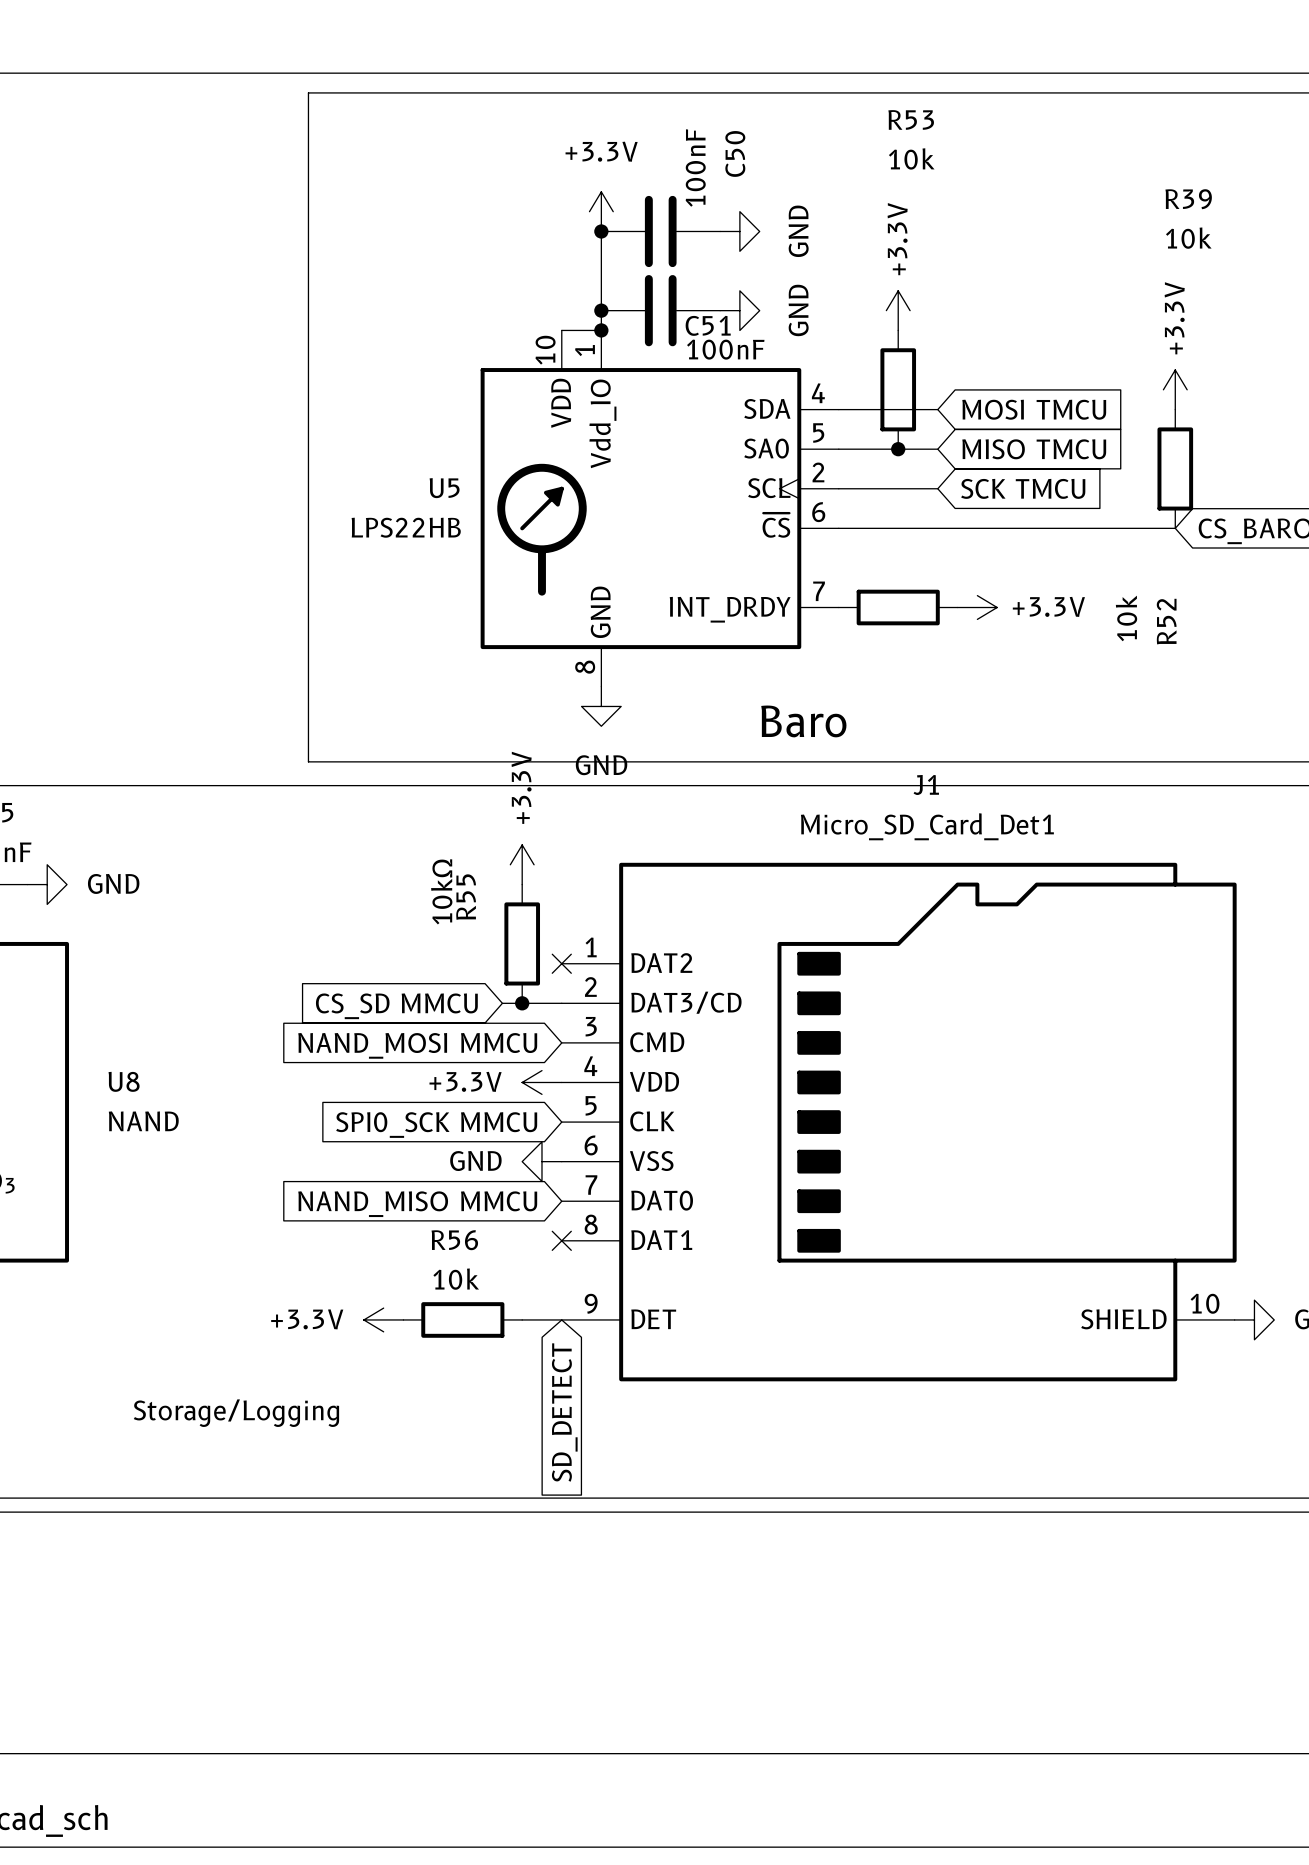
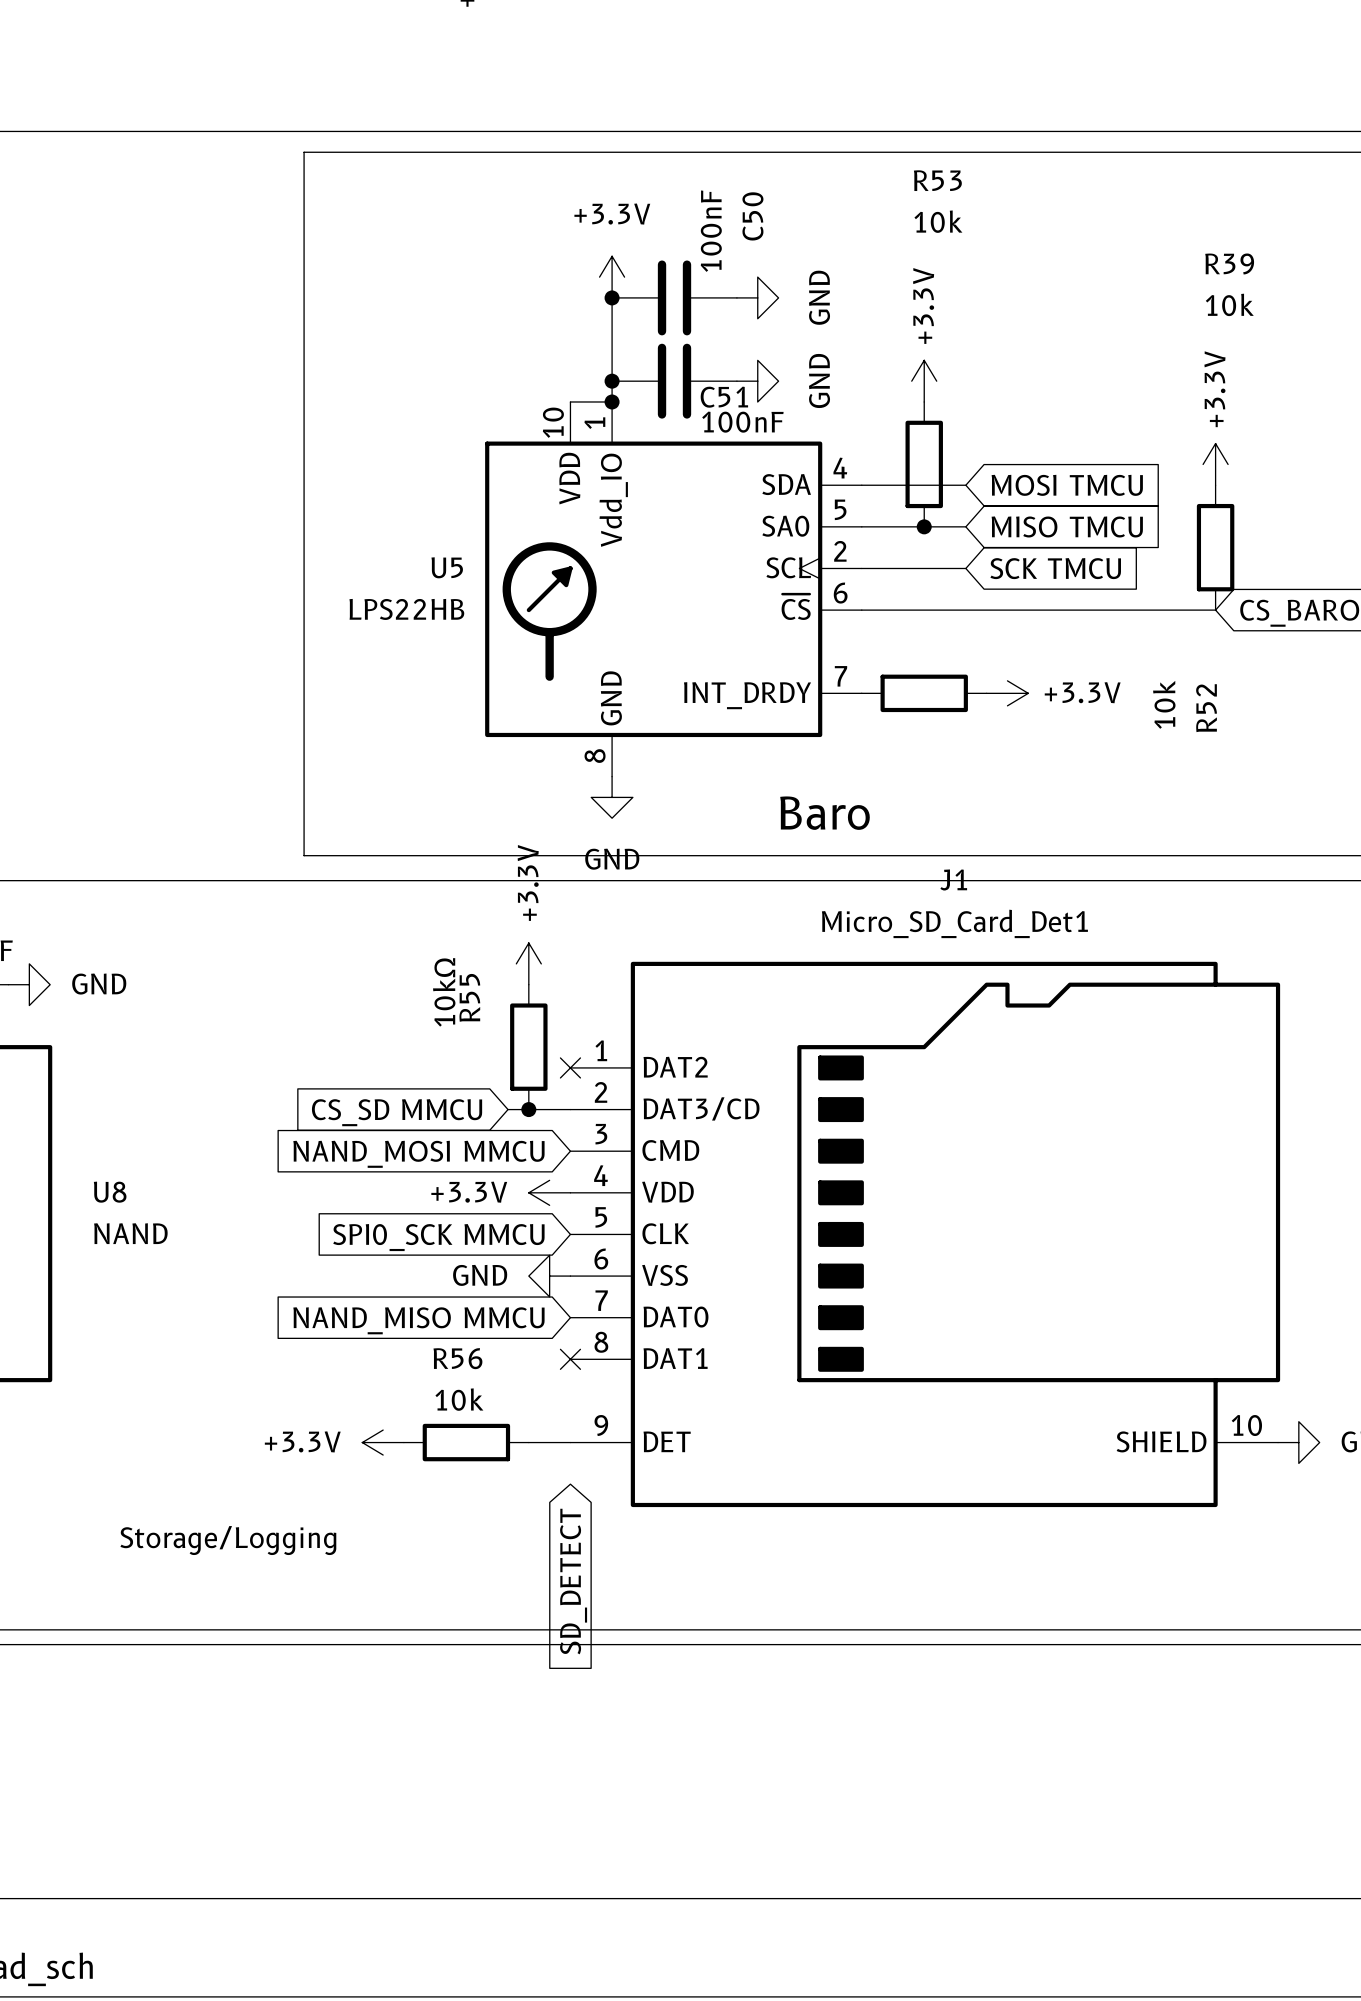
global label position: SD_DETECT (564, 1412) -> SD_DETECT (573, 1581)

